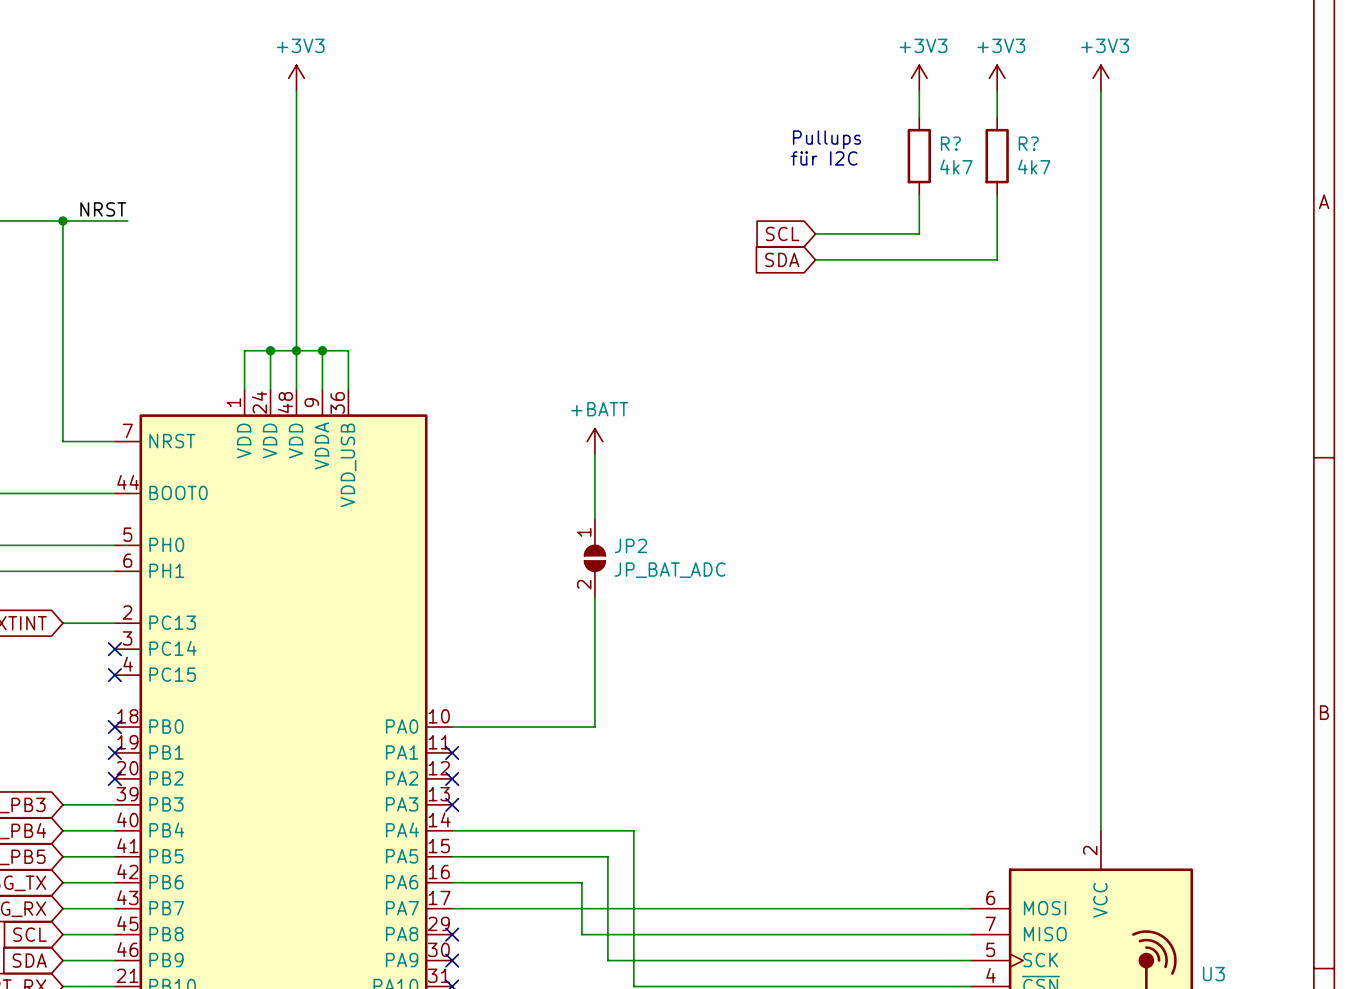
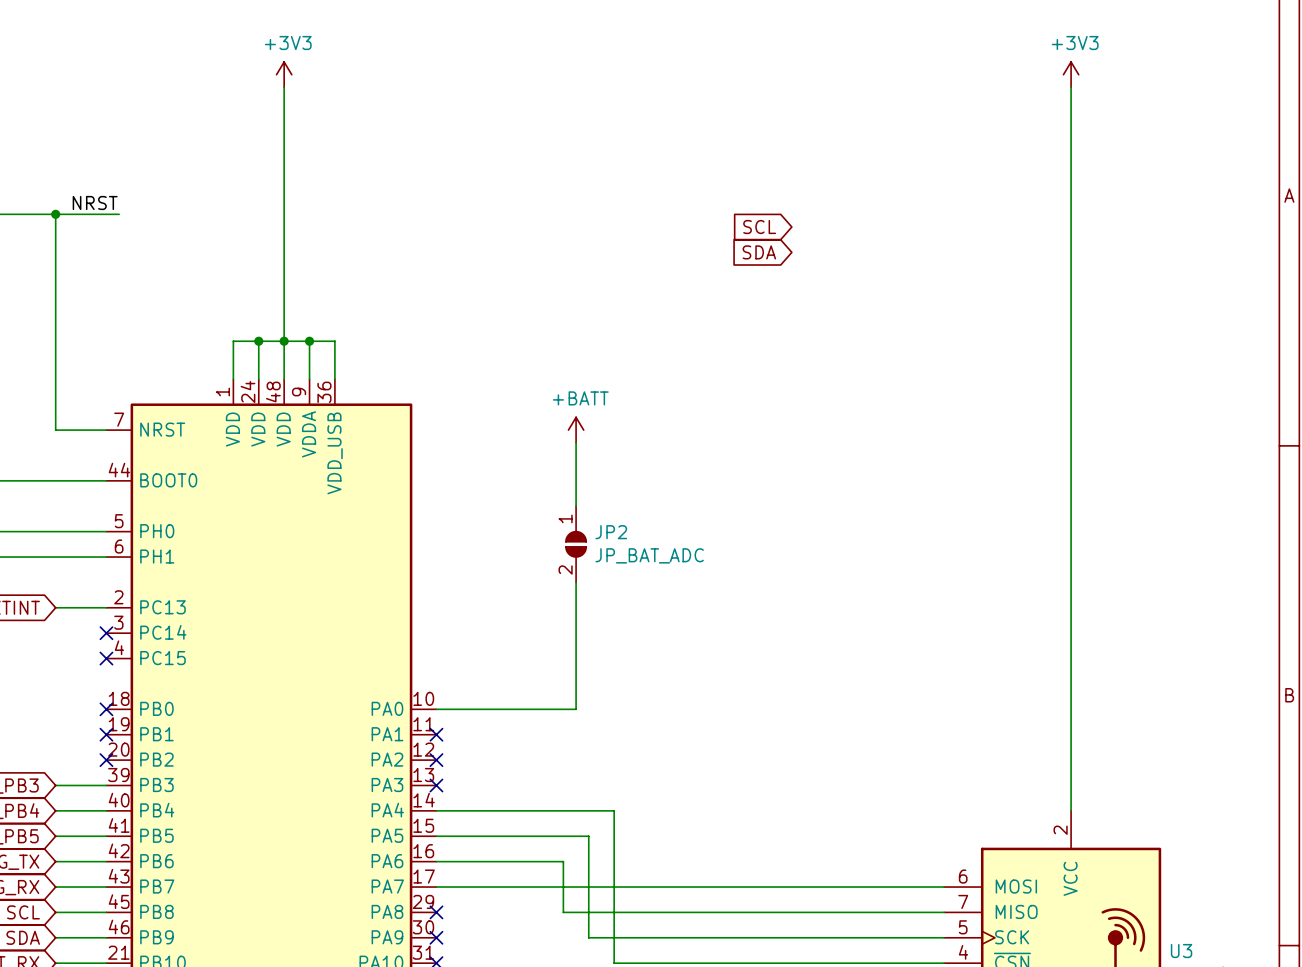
power symbol: +3V3 (919, 78) -> none
power symbol: +3V3 (997, 78) -> none
wire: (919, 91) (919, 117) -> none
wire: (997, 91) (997, 117) -> none
text: Pullups (827, 139) -> none
R?: 4k7 (919, 156) -> none
R?: 4k7 (997, 156) -> none
text: für I2C (824, 158) -> none
wire: (919, 195) (919, 233) (815, 233) -> none
wire: (997, 195) (997, 259) (815, 259) -> none

